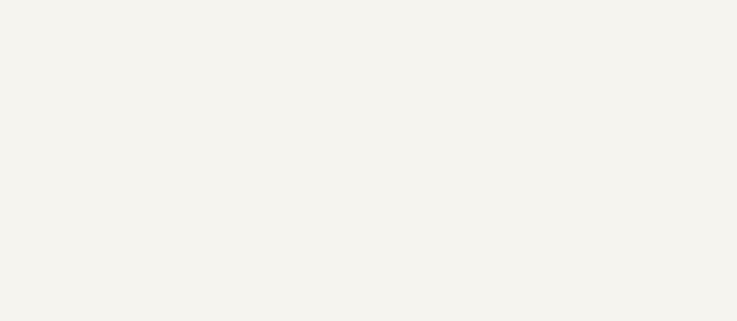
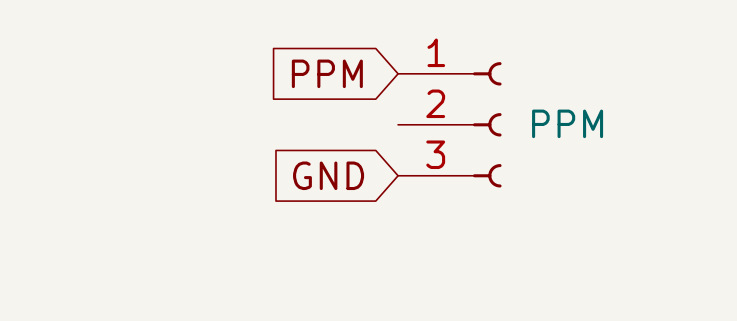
global label: none -> PPM (327, 73)
part: none -> PPM (449, 124)
global label: none -> GND (328, 175)

